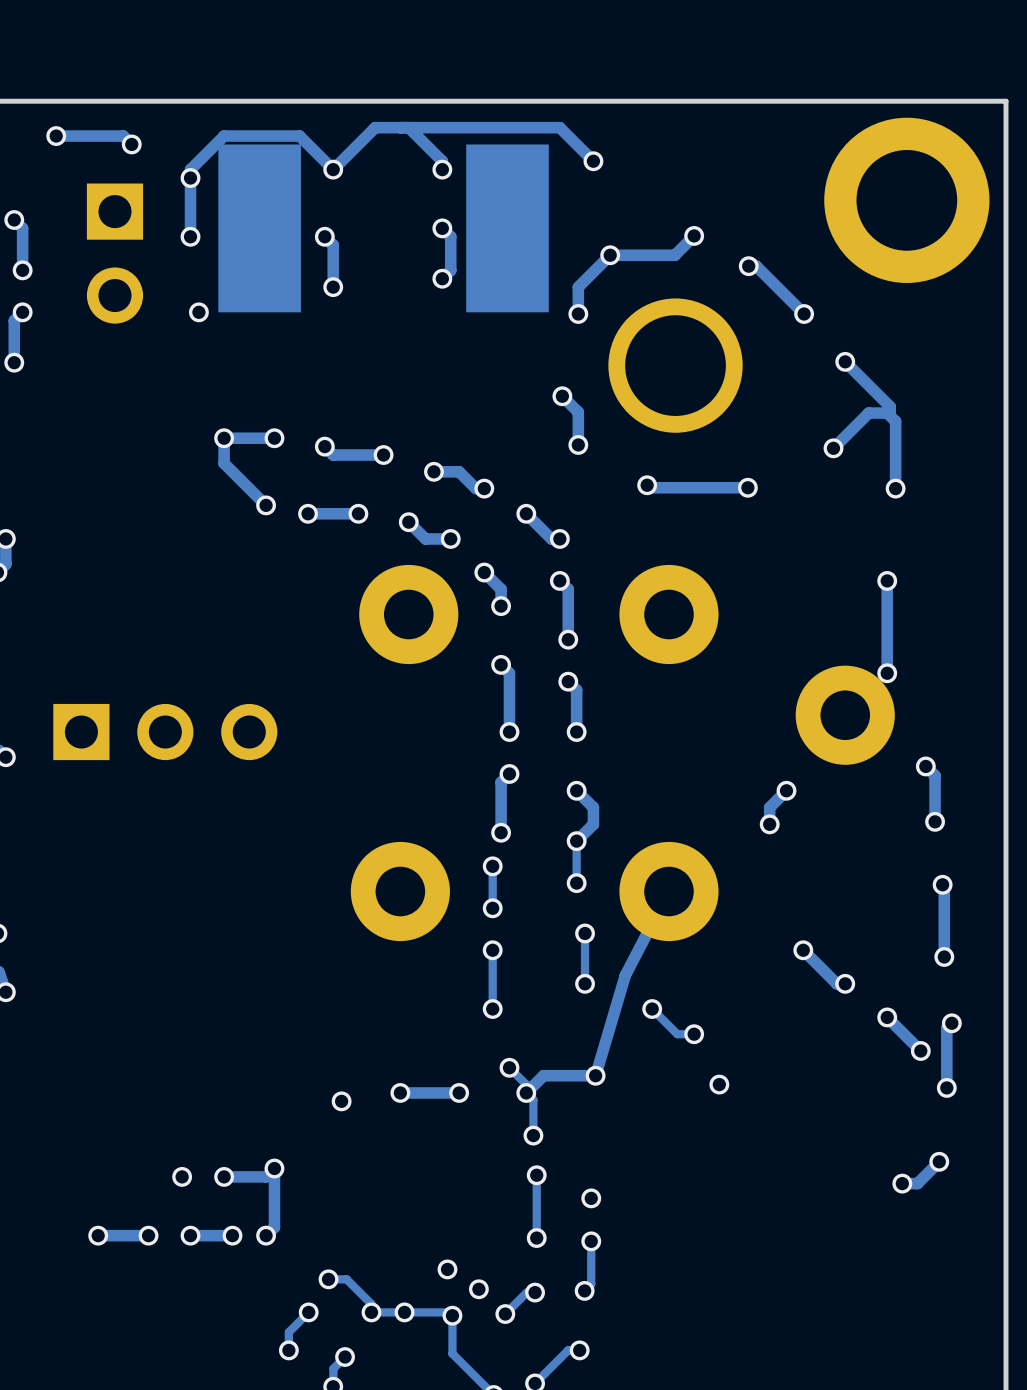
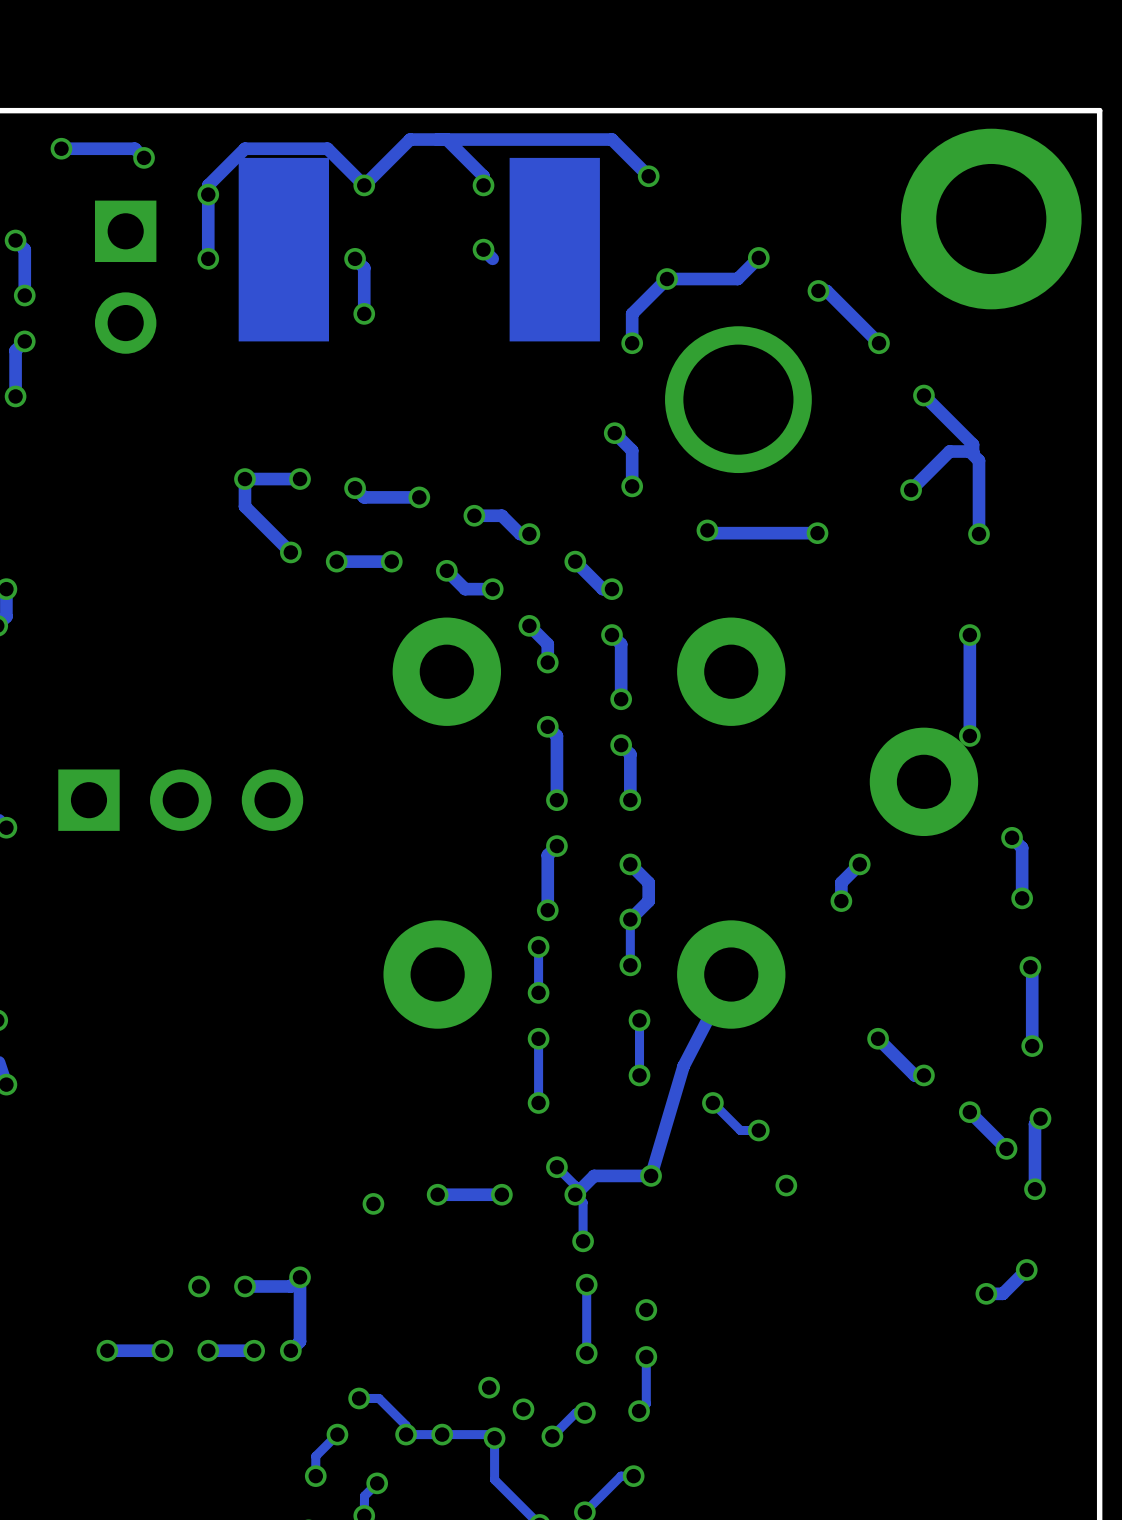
track: (450, 236) (450, 270) (442, 278) -> none
via: (442, 278) -> none
via: (198, 312) -> none

